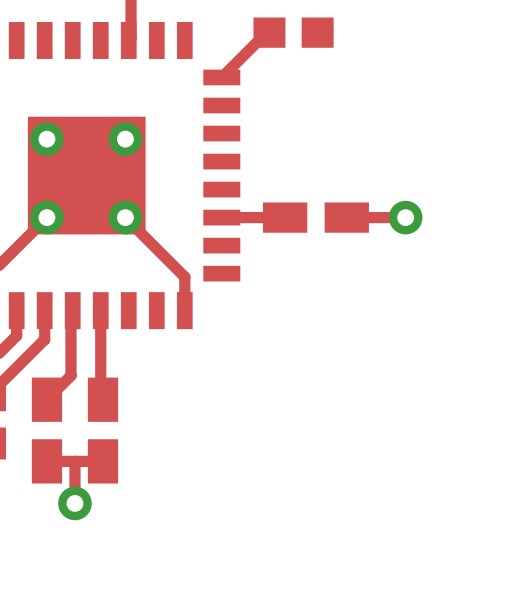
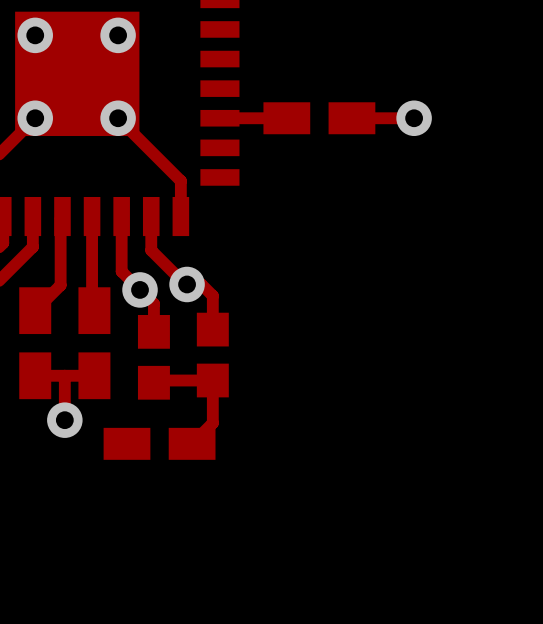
top track: none -> (121, 216) (121, 271) (153, 303) (153, 331)
top track: none -> (151, 216) (151, 250) (186, 284)
top track: none -> (187, 284) (201, 284) (212, 295) (212, 329)
via: none -> (187, 284)
via: none -> (140, 289)
part: none -> (212, 355)
part: none -> (153, 357)
top track: none -> (153, 382) (156, 380) (212, 380) (212, 423) (192, 443)
part: none -> (159, 443)

